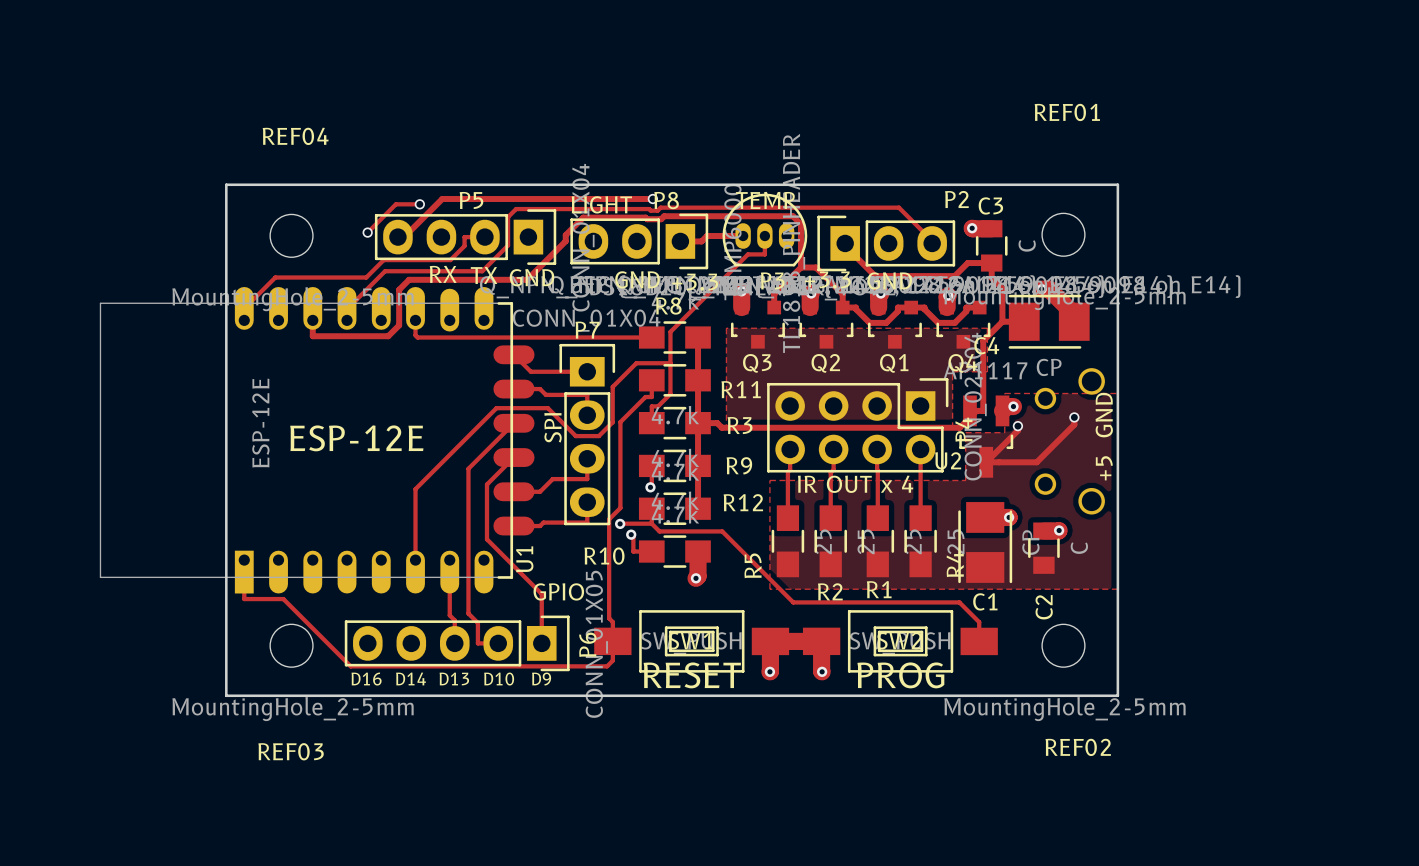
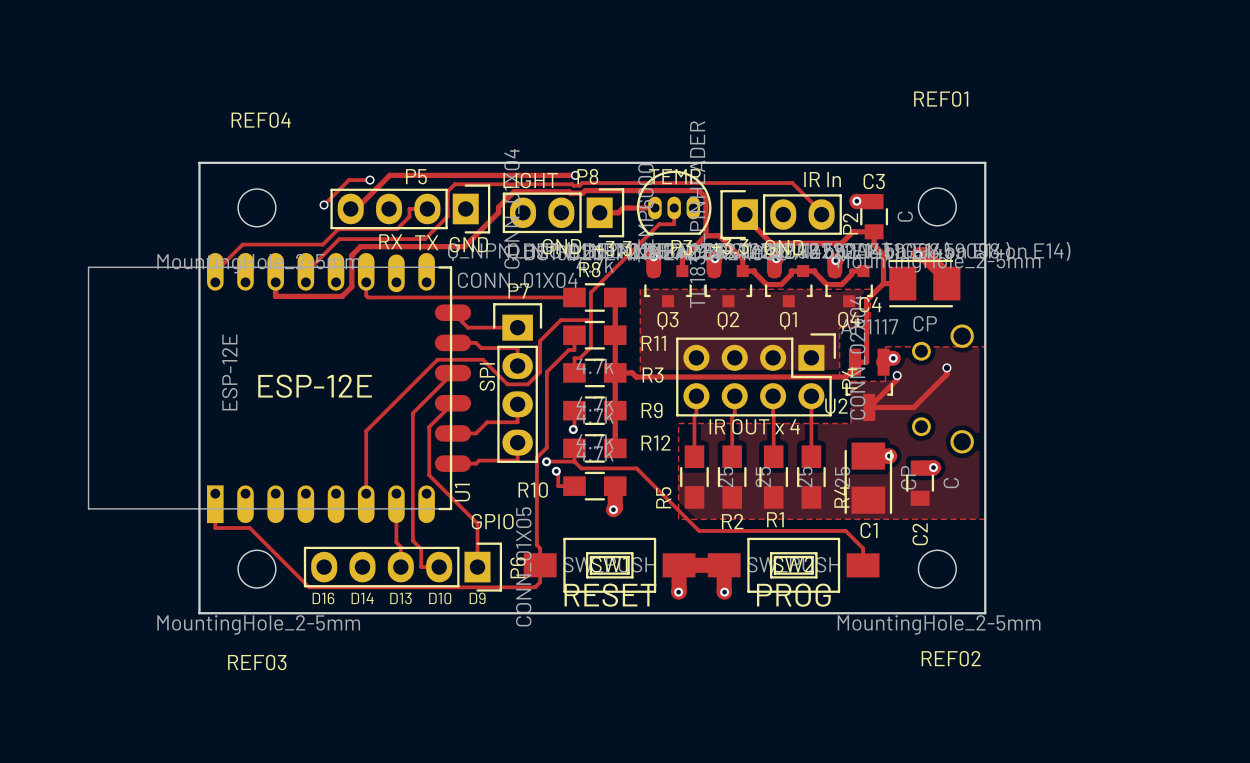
P2 name rotation: 0° (956, 199) -> 90° counterclockwise (850, 223)
P2 name position: P2 (956, 199) -> P2 (850, 223)
text: none -> IR In (822, 179)
text: GND (1104, 415) -> none
text: +5 (1104, 468) -> none

